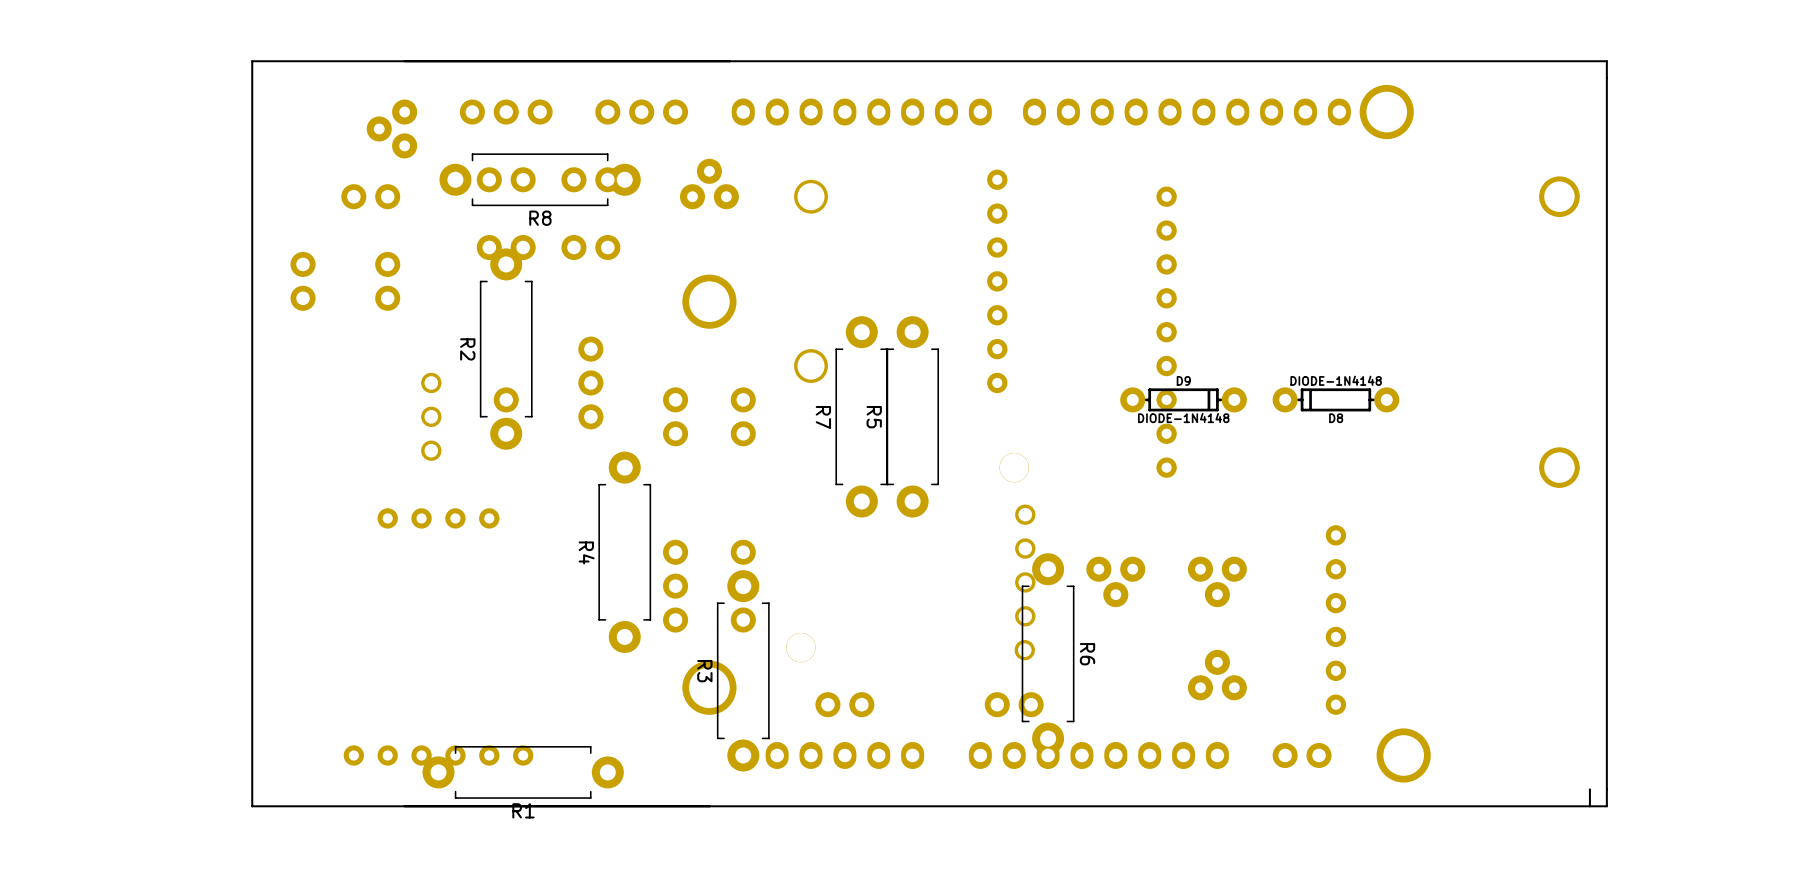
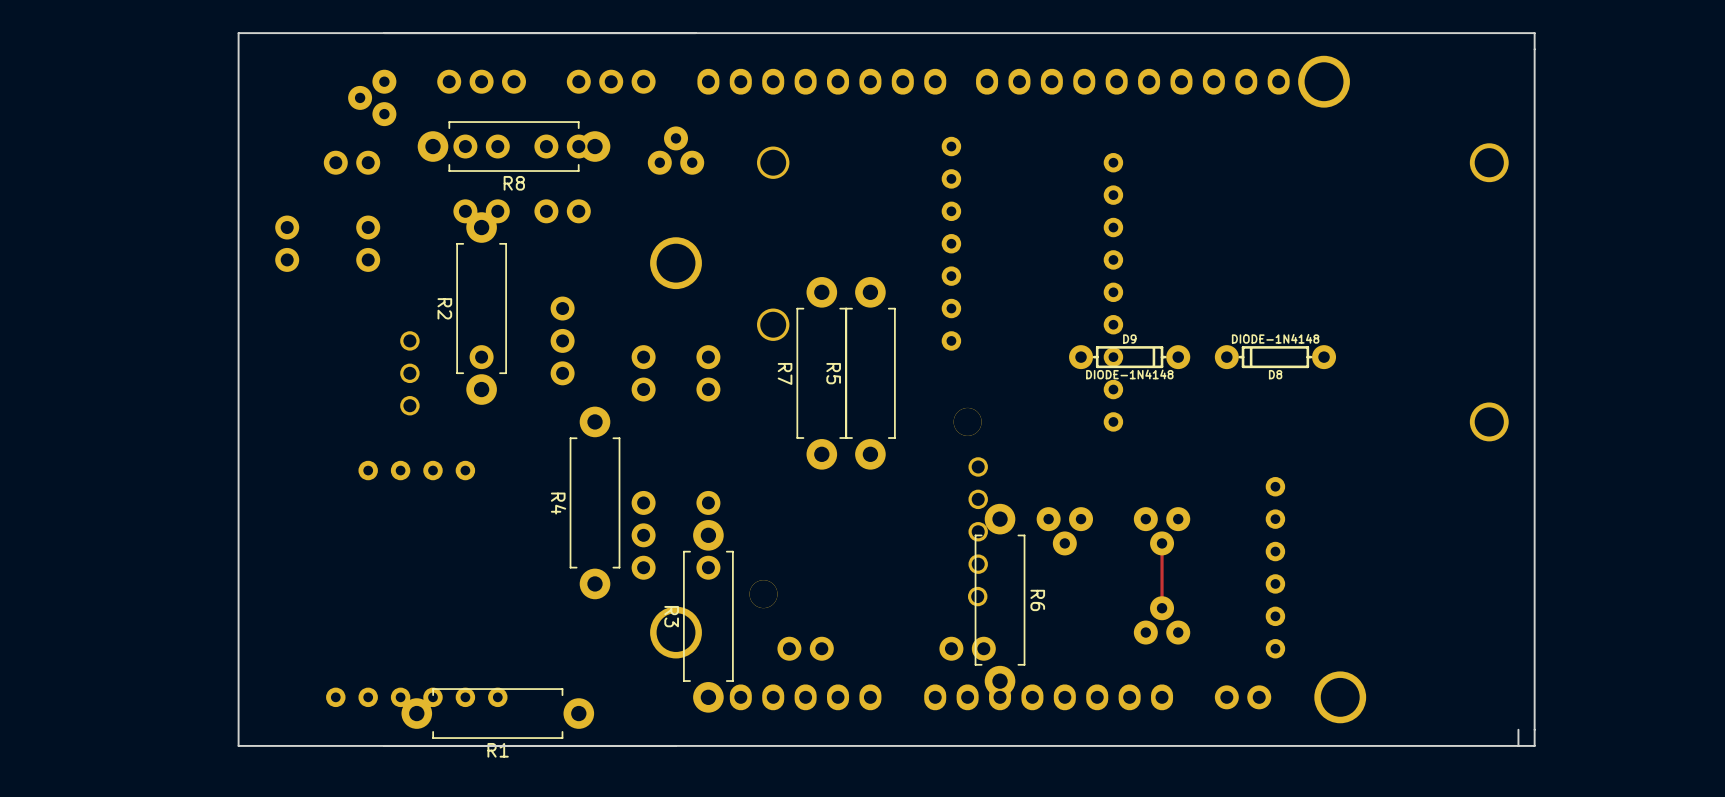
top track: none -> (1162, 543) (1162, 608)

